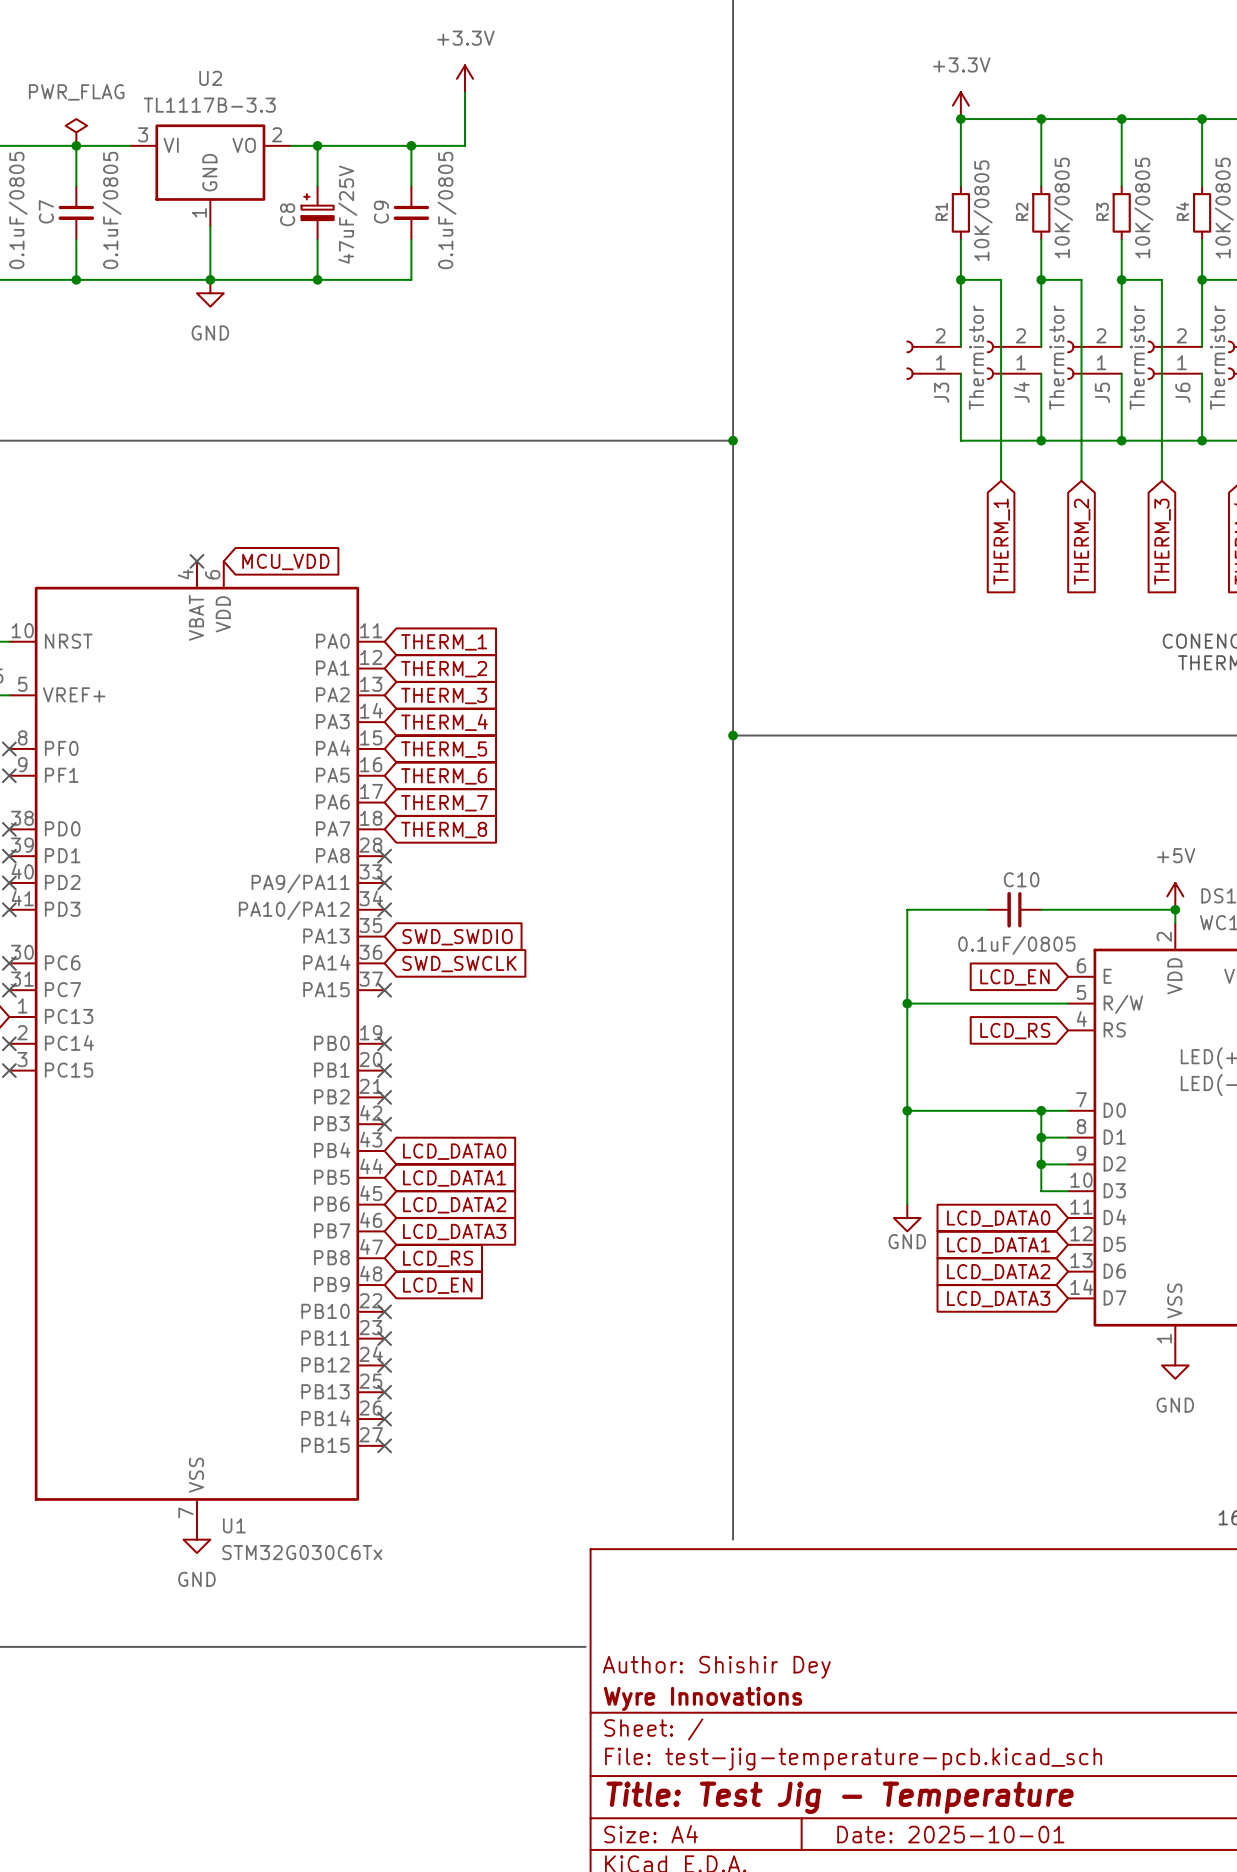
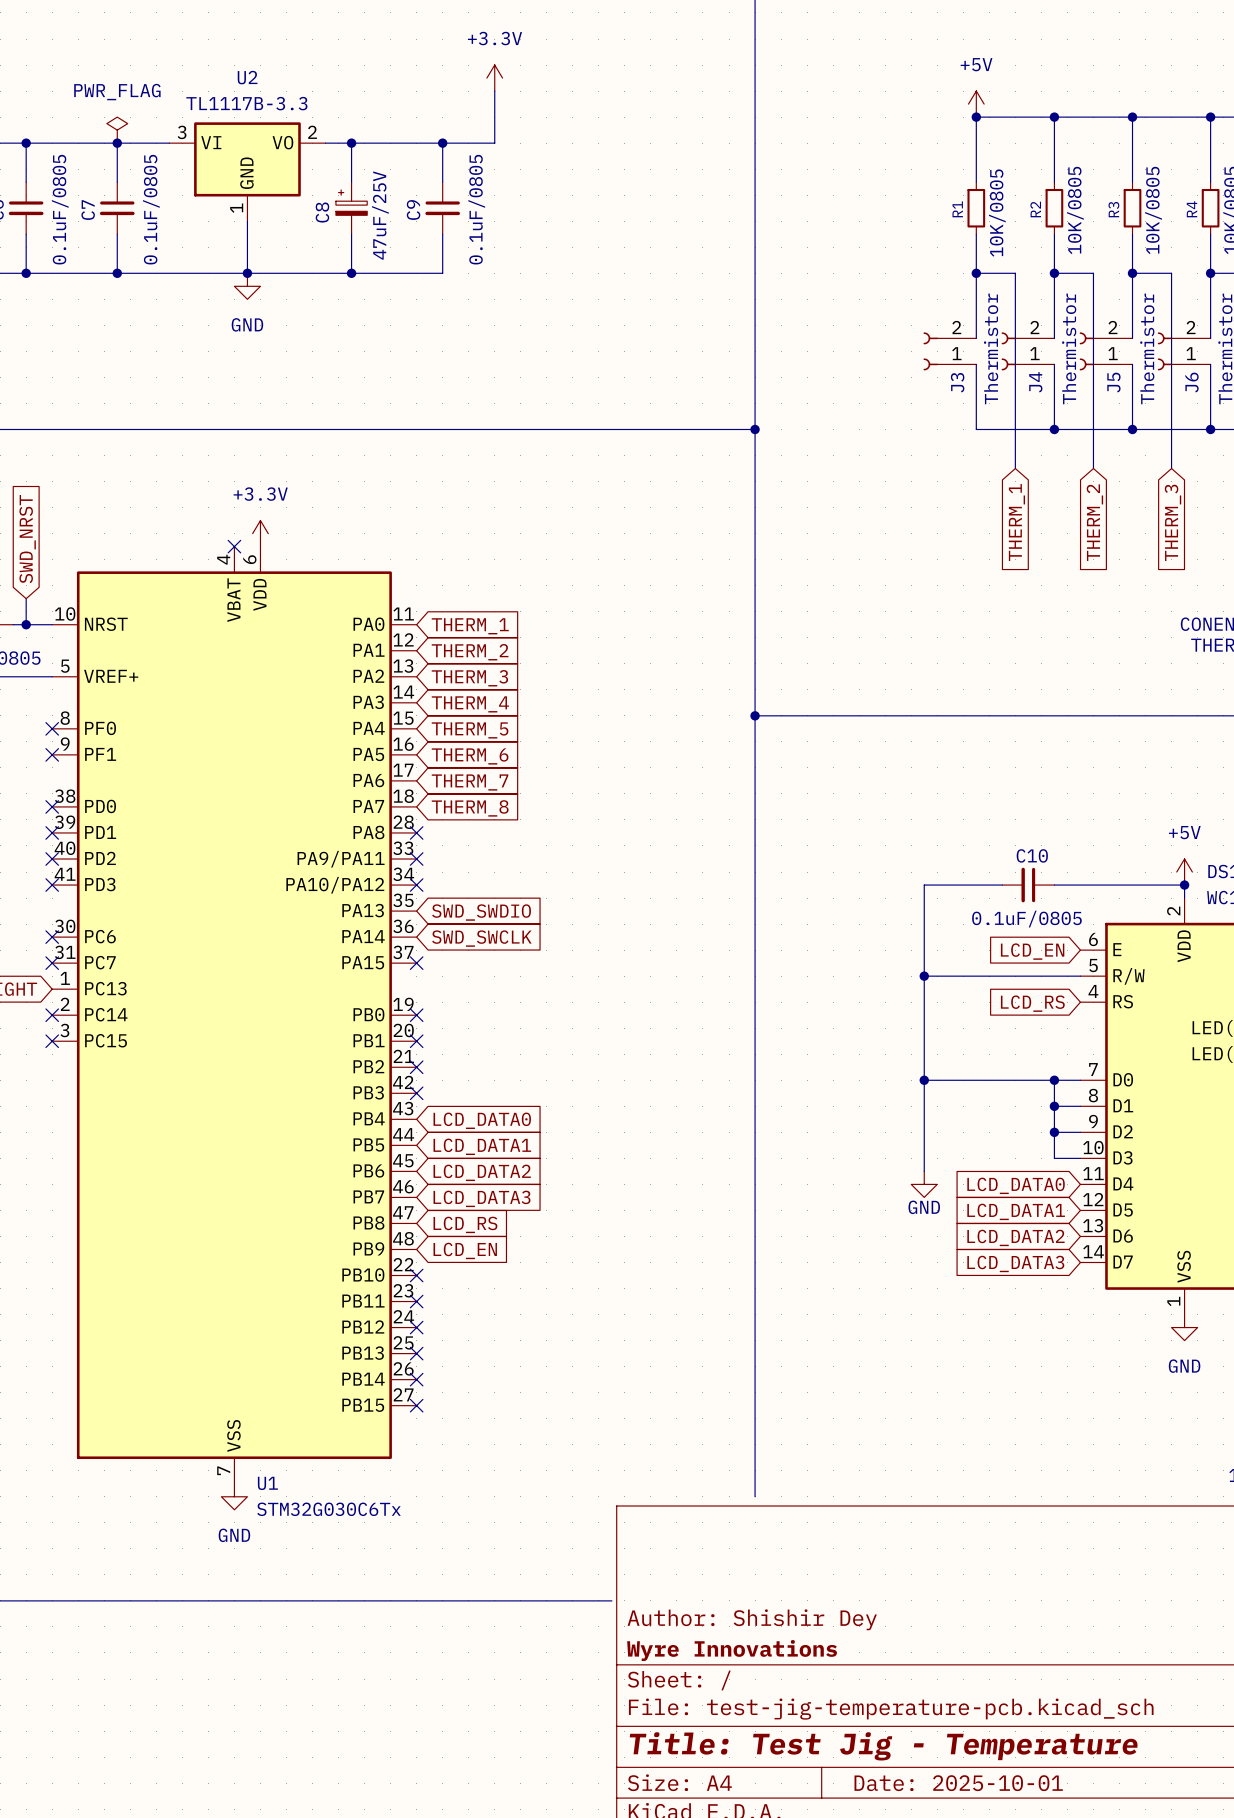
power symbol: +3.3V (960, 105) -> +5V (976, 104)
power symbol: none -> +3.3V (260, 533)
global label: MCU_VDD (285, 561) -> none

